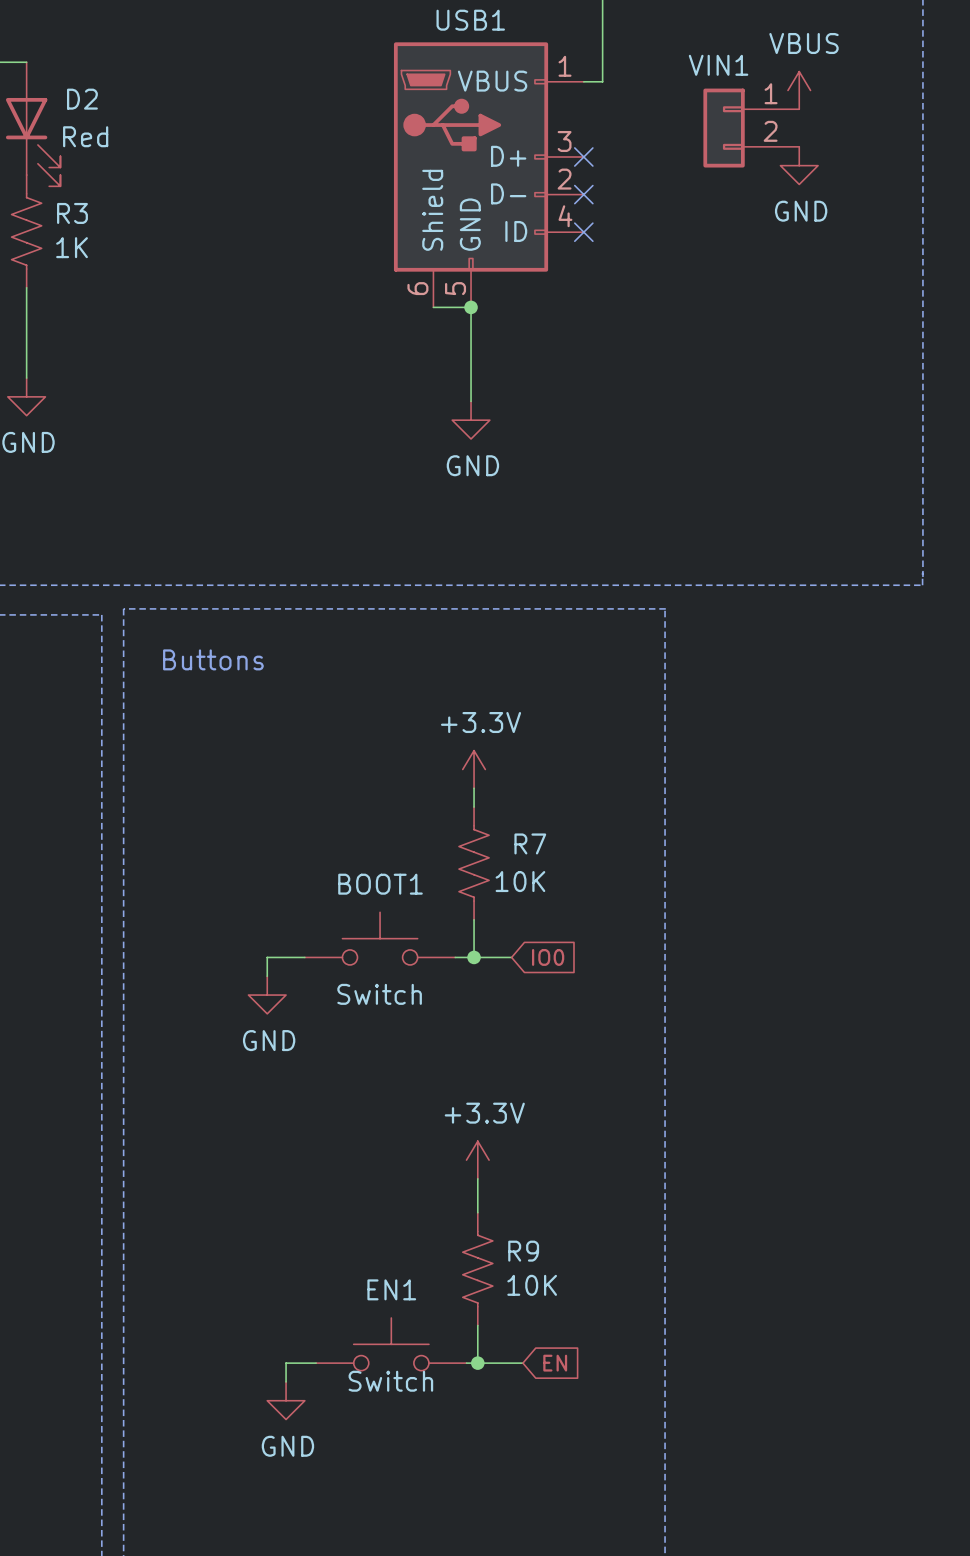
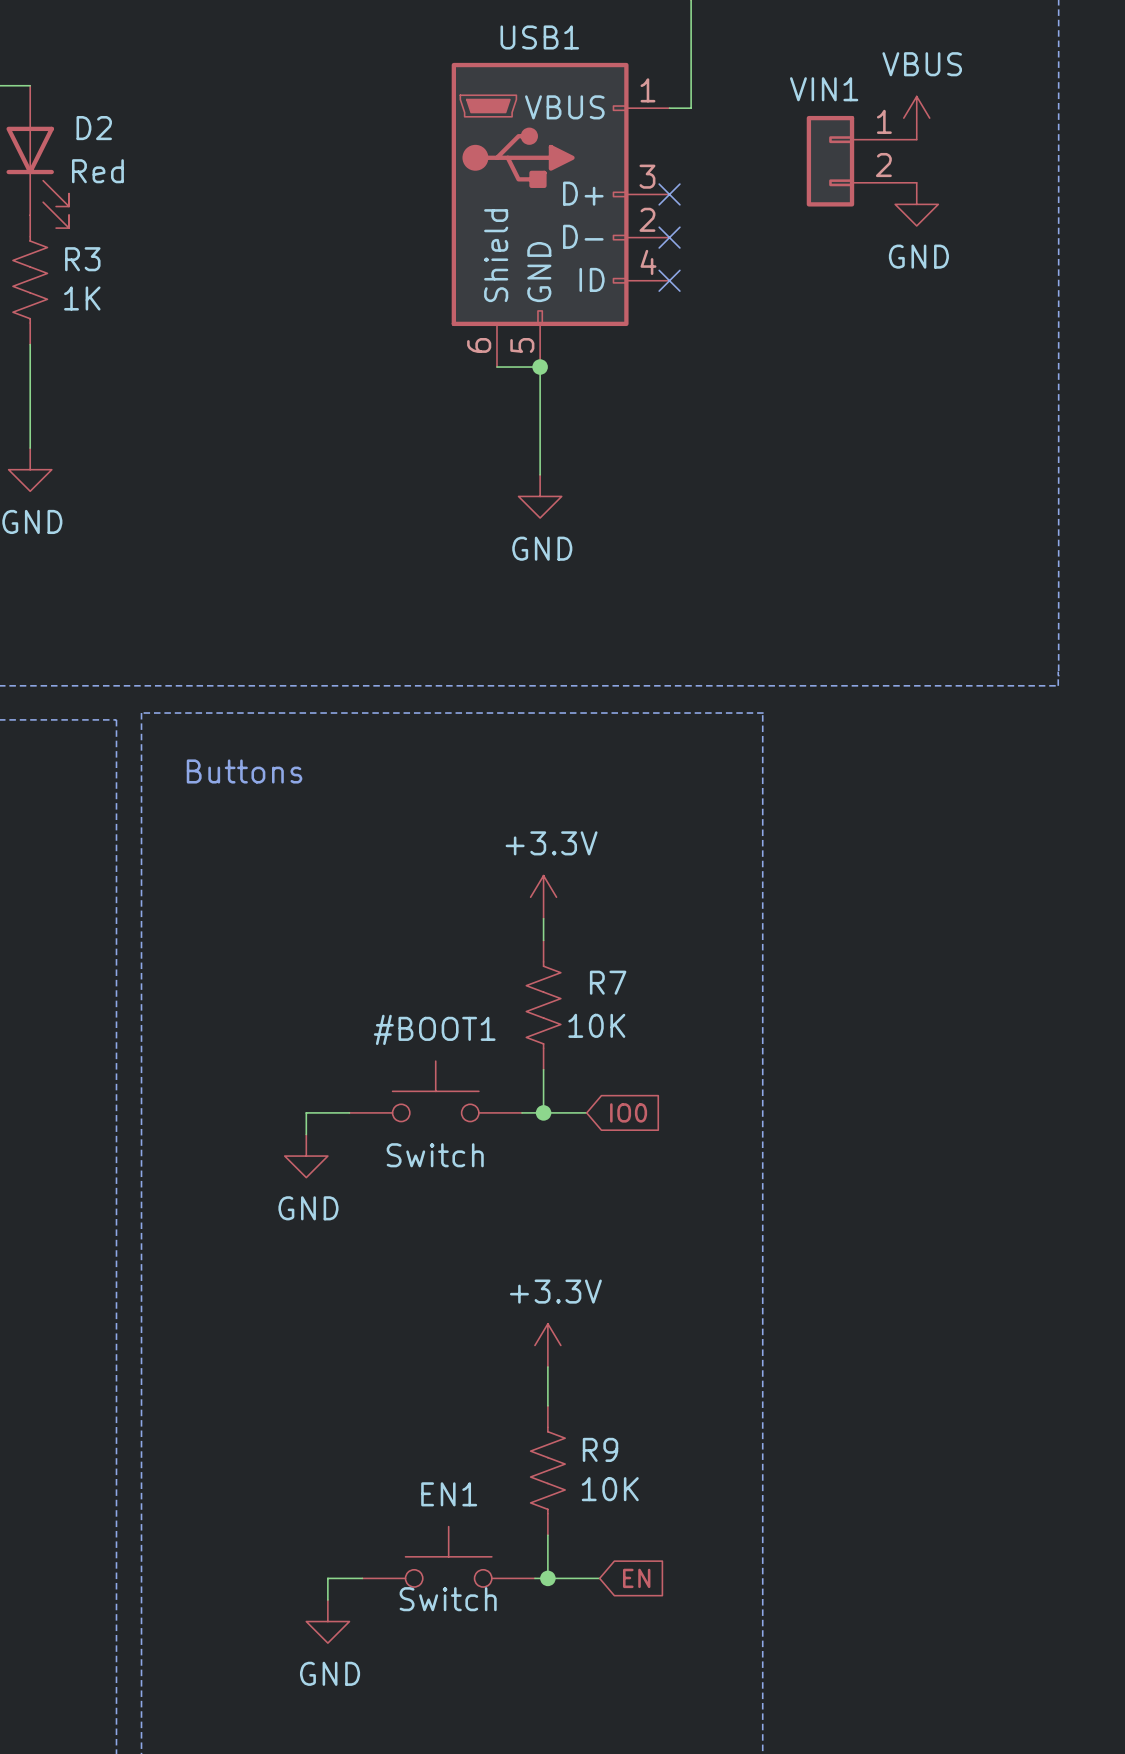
BOOT1: Switch (380, 938) -> none
#BOOT1: none -> Switch (435, 1091)

